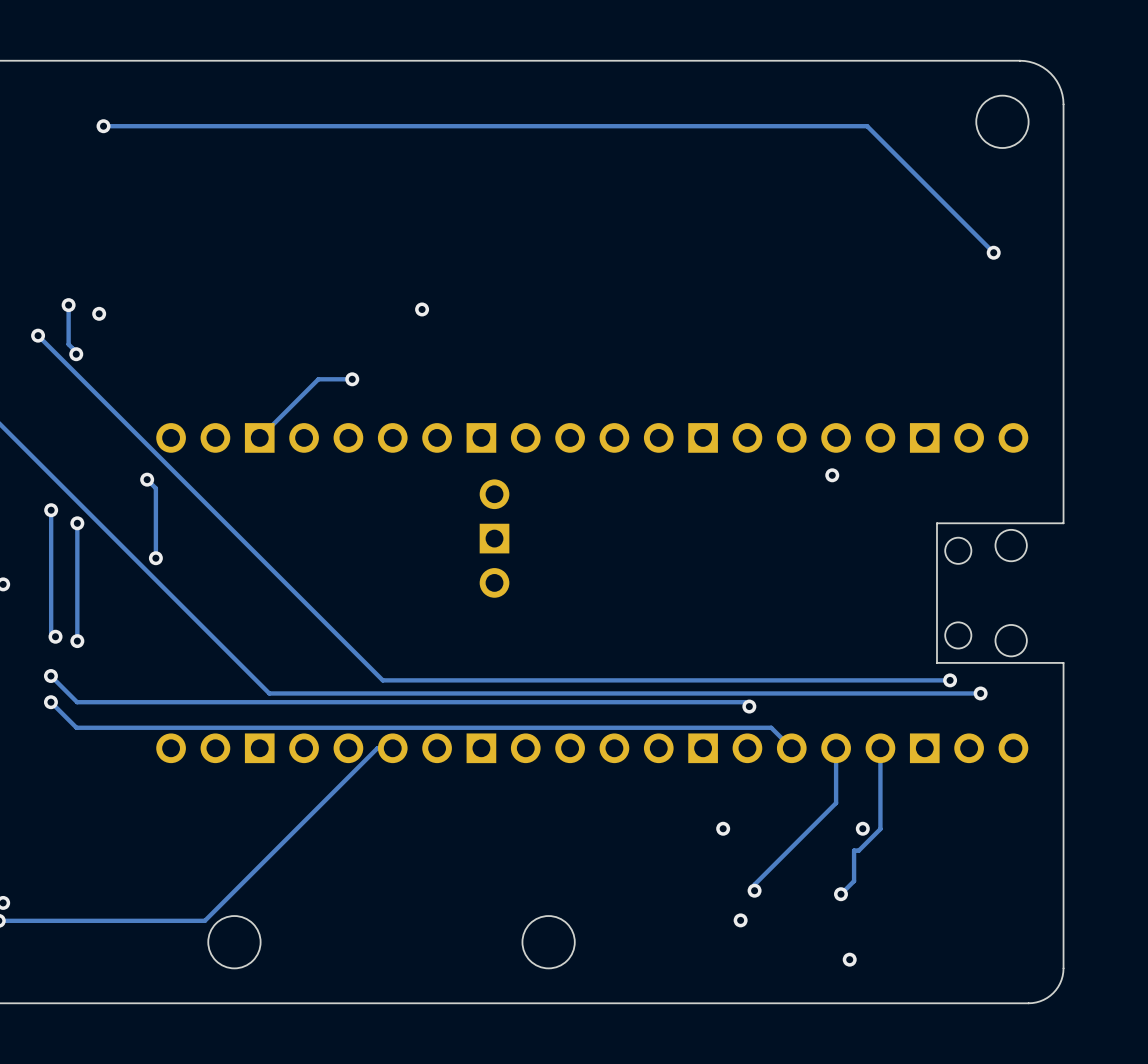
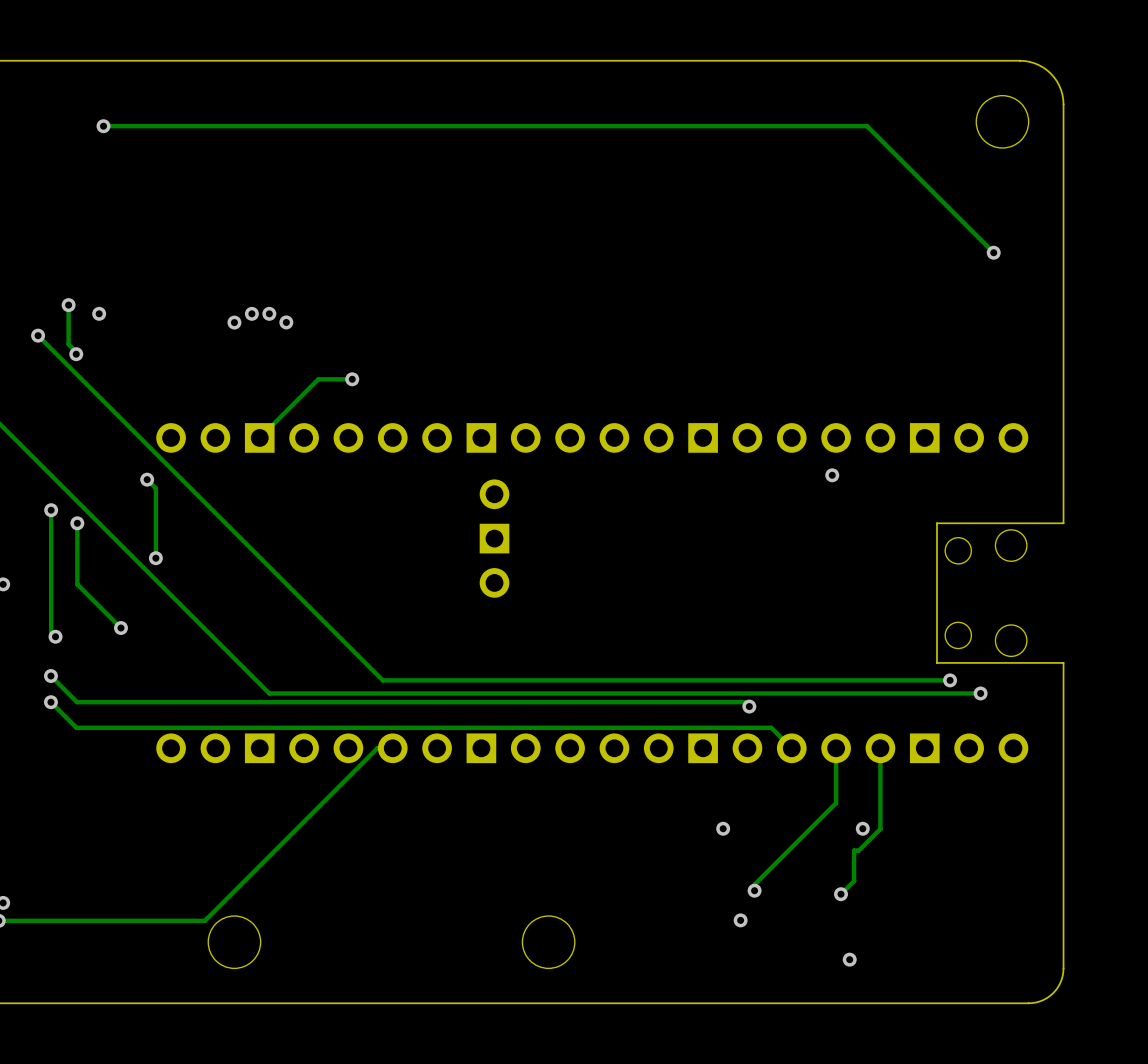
via: (422, 309) -> none
via: none -> (251, 313)
via: none -> (269, 313)
via: none -> (234, 322)
via: none -> (286, 322)
track: (77, 584) (77, 641) -> (77, 584) (120, 628)
via position: (77, 641) -> (120, 628)

